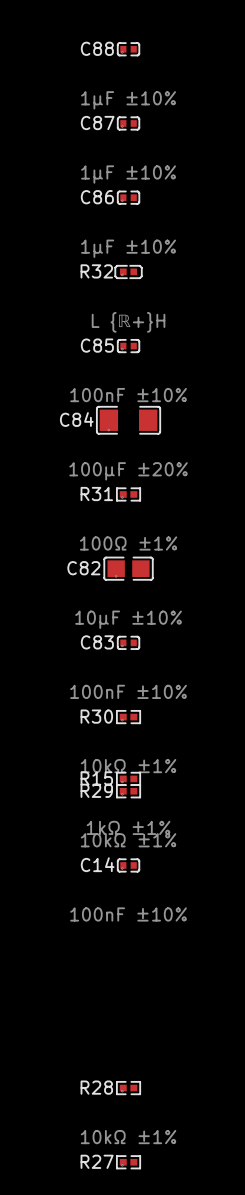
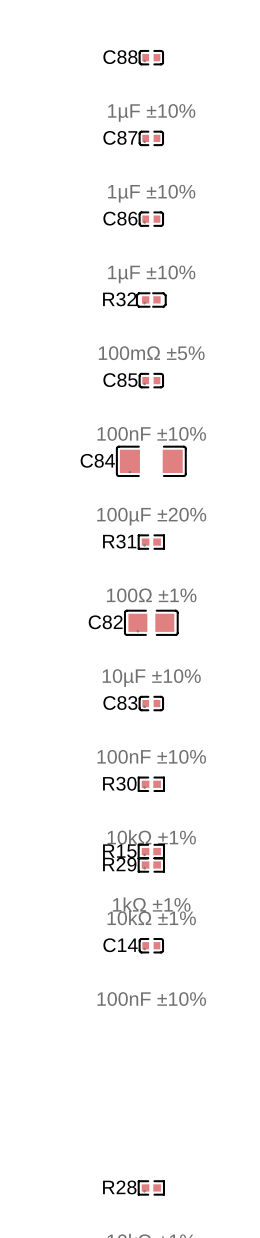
R32 value: L {ℝ+}H (128, 322) -> 100mΩ ±5% (151, 353)

